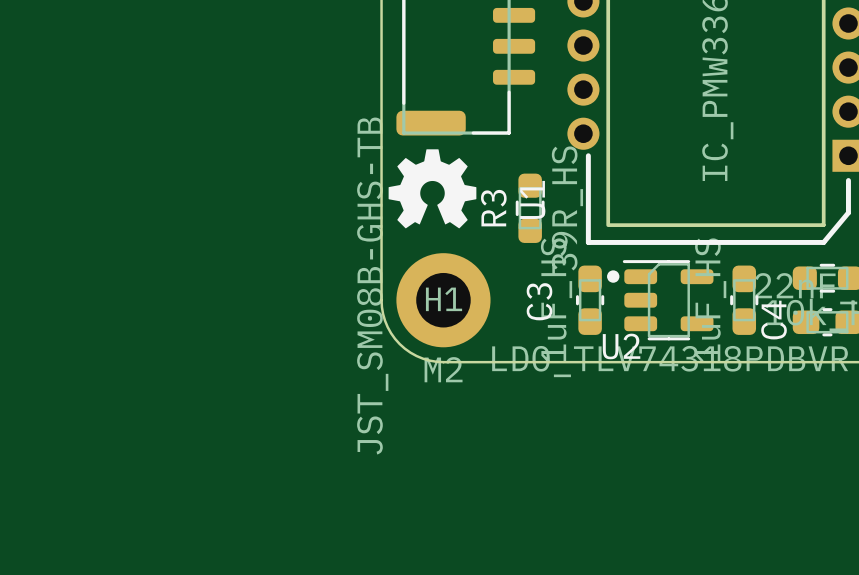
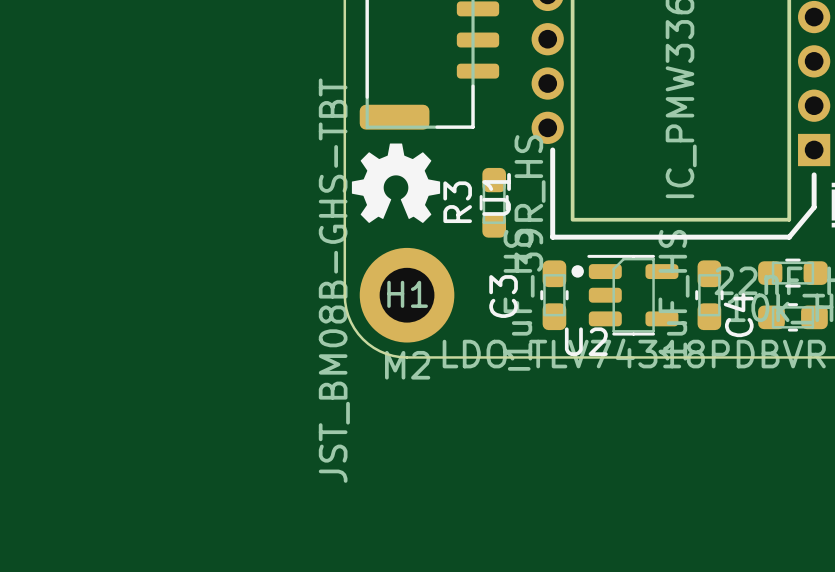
part value: JST_SM08B-GHS-TB (372, 286) -> JST_BM08B-GHS-TBT (334, 280)

